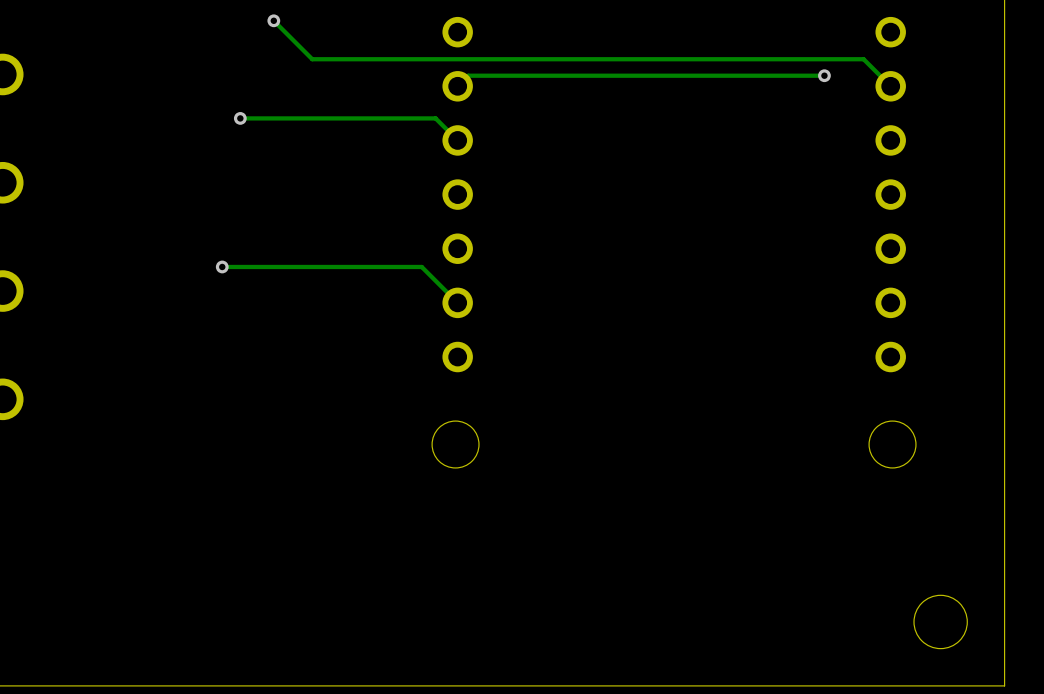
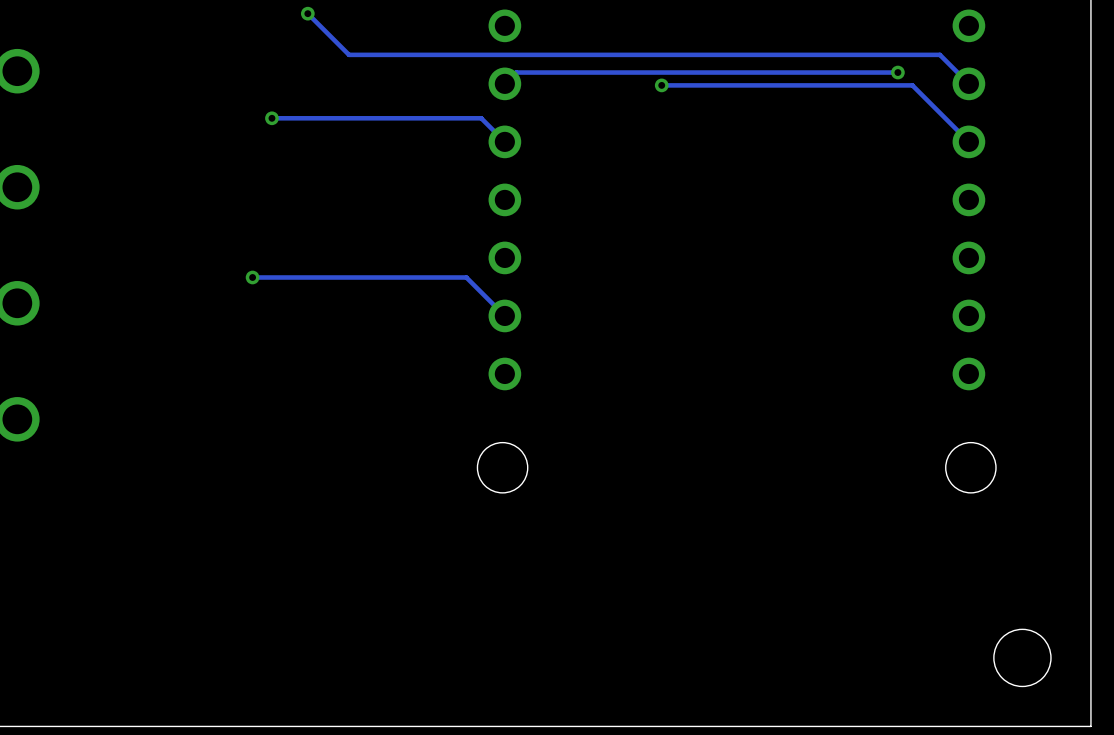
track: none -> (661, 85) (912, 85) (968, 141)
via: none -> (661, 85)

